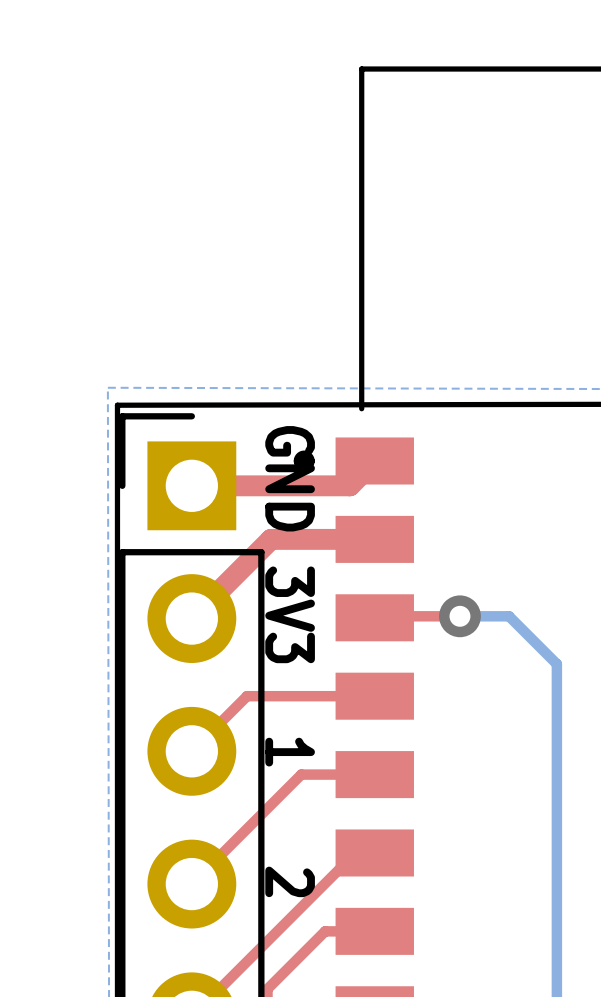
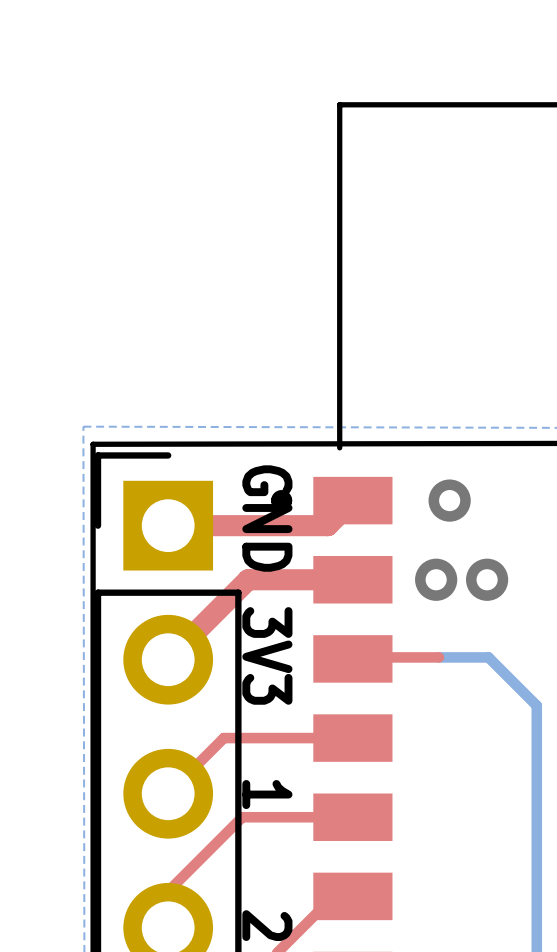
via: none -> (449, 500)
via: none -> (436, 579)
via: none -> (487, 579)
via: (459, 616) -> none
top track: (301, 774) (191, 884) -> (278, 817) (242, 817) (168, 891) (168, 927)

